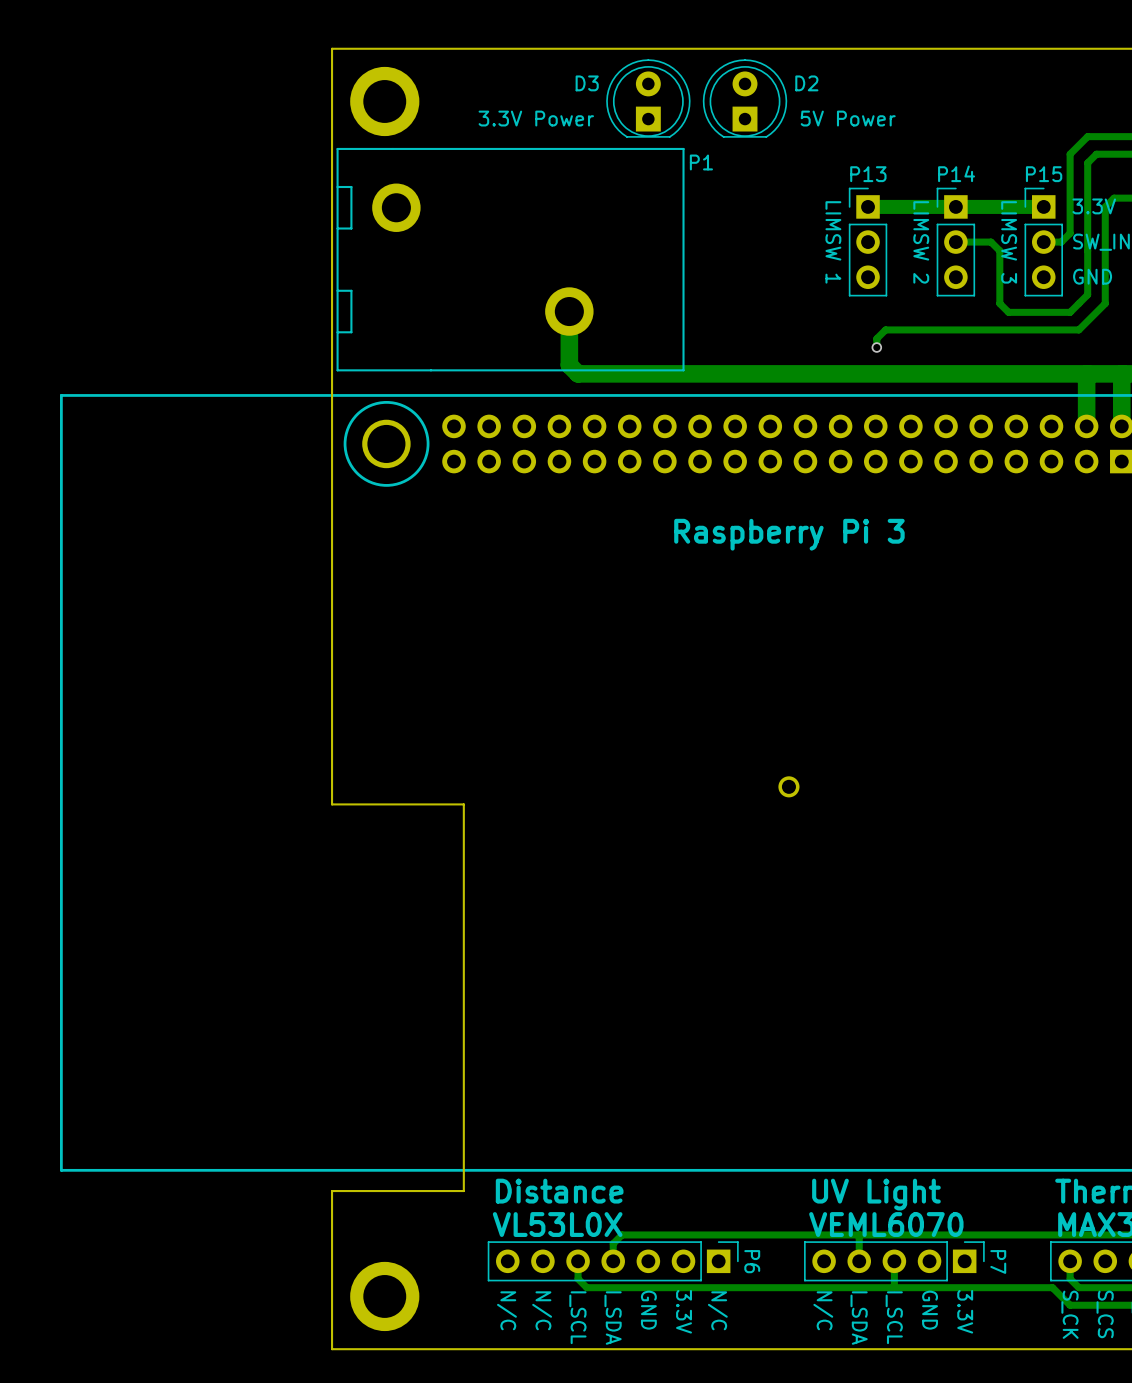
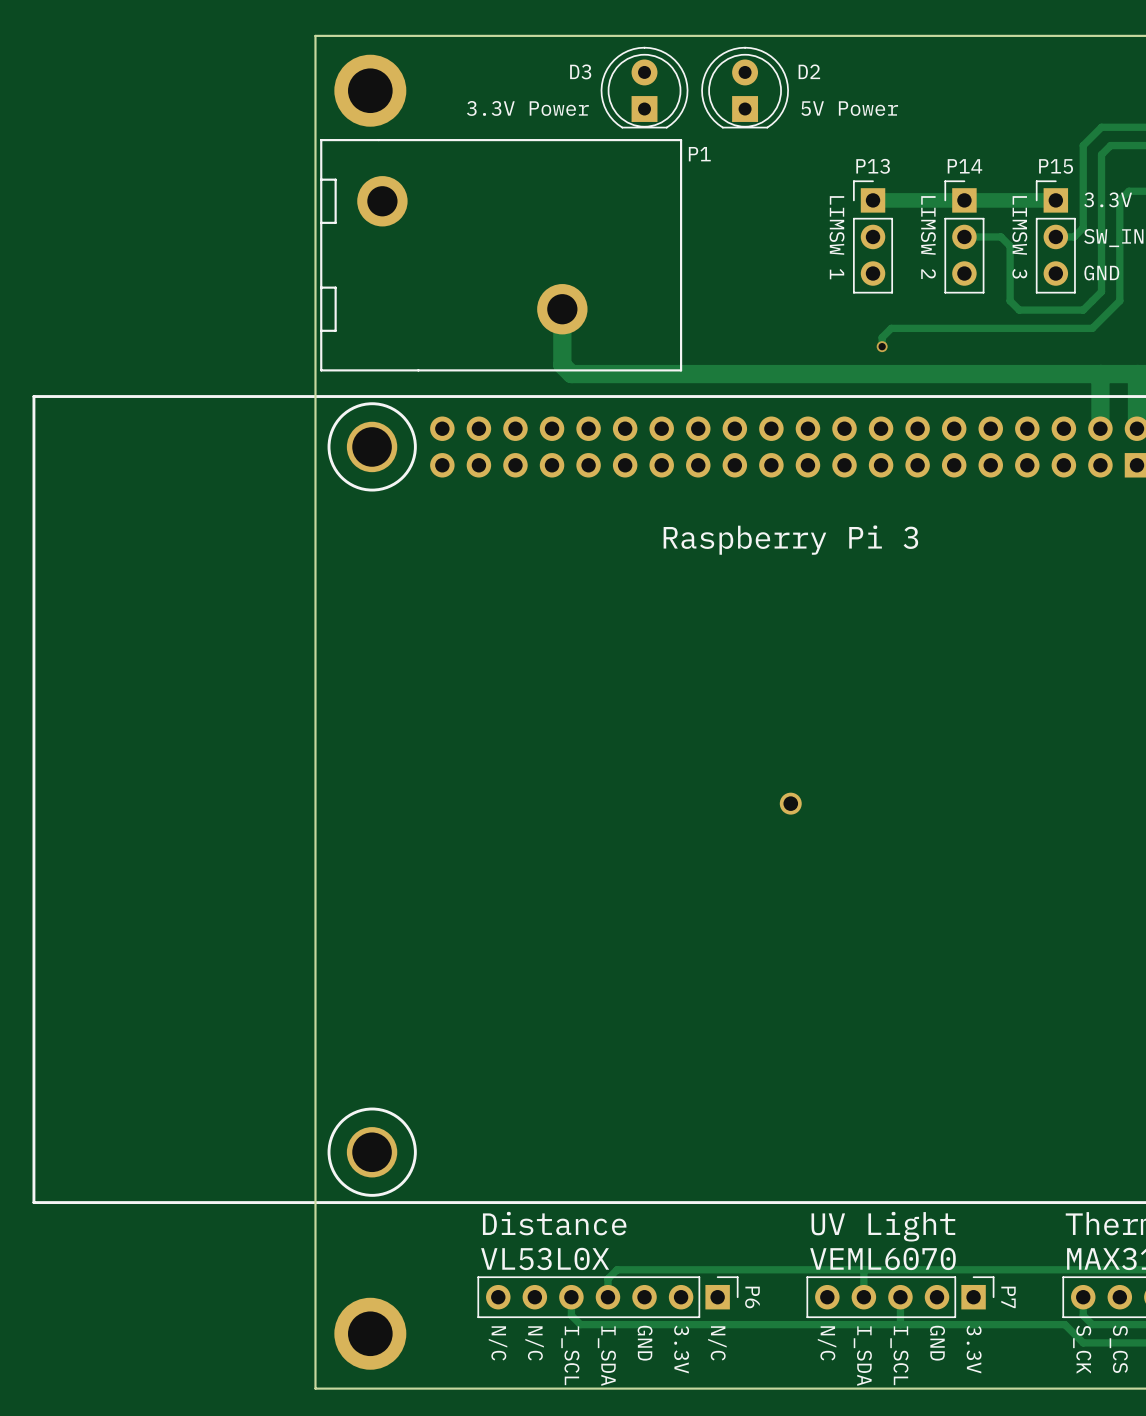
board edge: (332, 804) (463, 804) (463, 1191) (332, 1191) -> (315, 821) (315, 1224)
drawing: none -> [327, 1107, 417, 1197]
part: none -> (372, 1152)

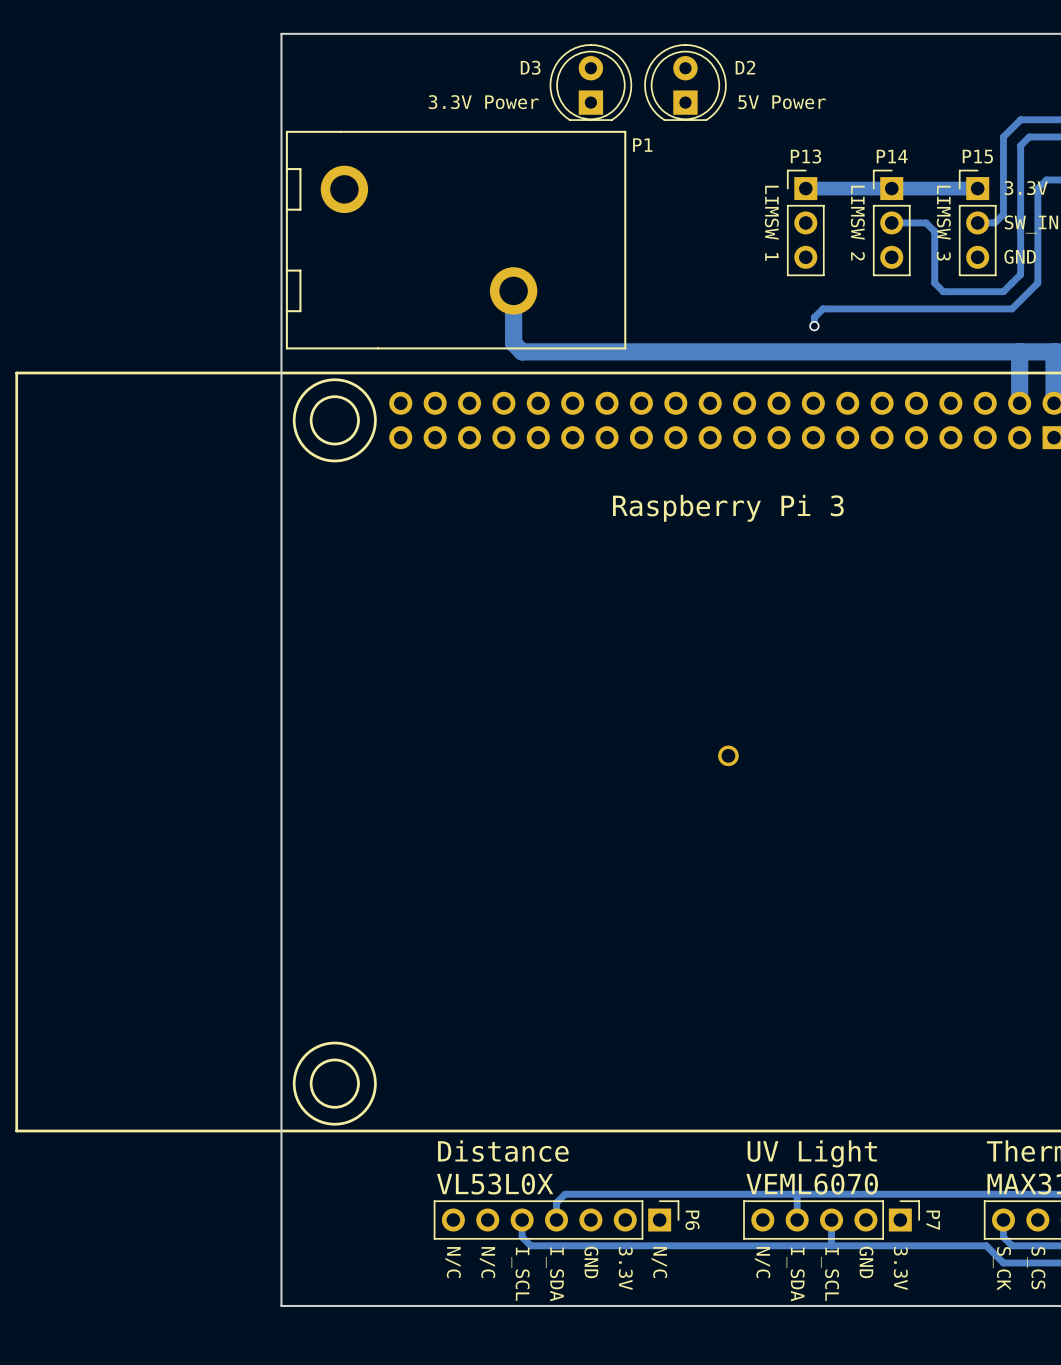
part: (370, 90) -> none
drawing: none -> [309, 395, 360, 446]
part: (372, 446) -> none
drawing: none -> [309, 1058, 360, 1109]
part: (372, 1152) -> none
part: (370, 1333) -> none

